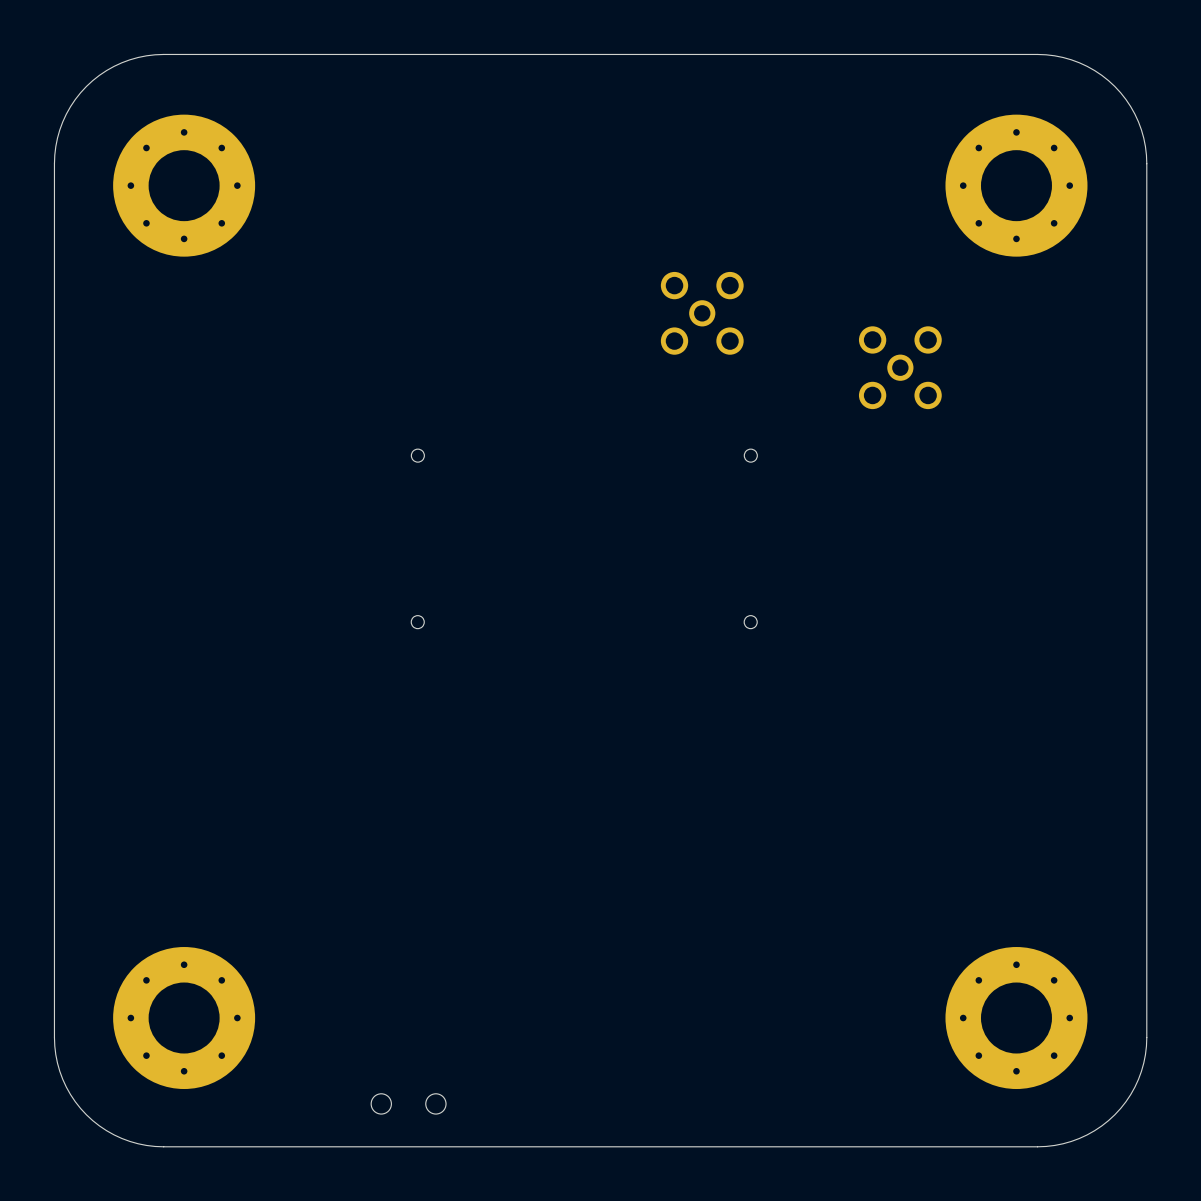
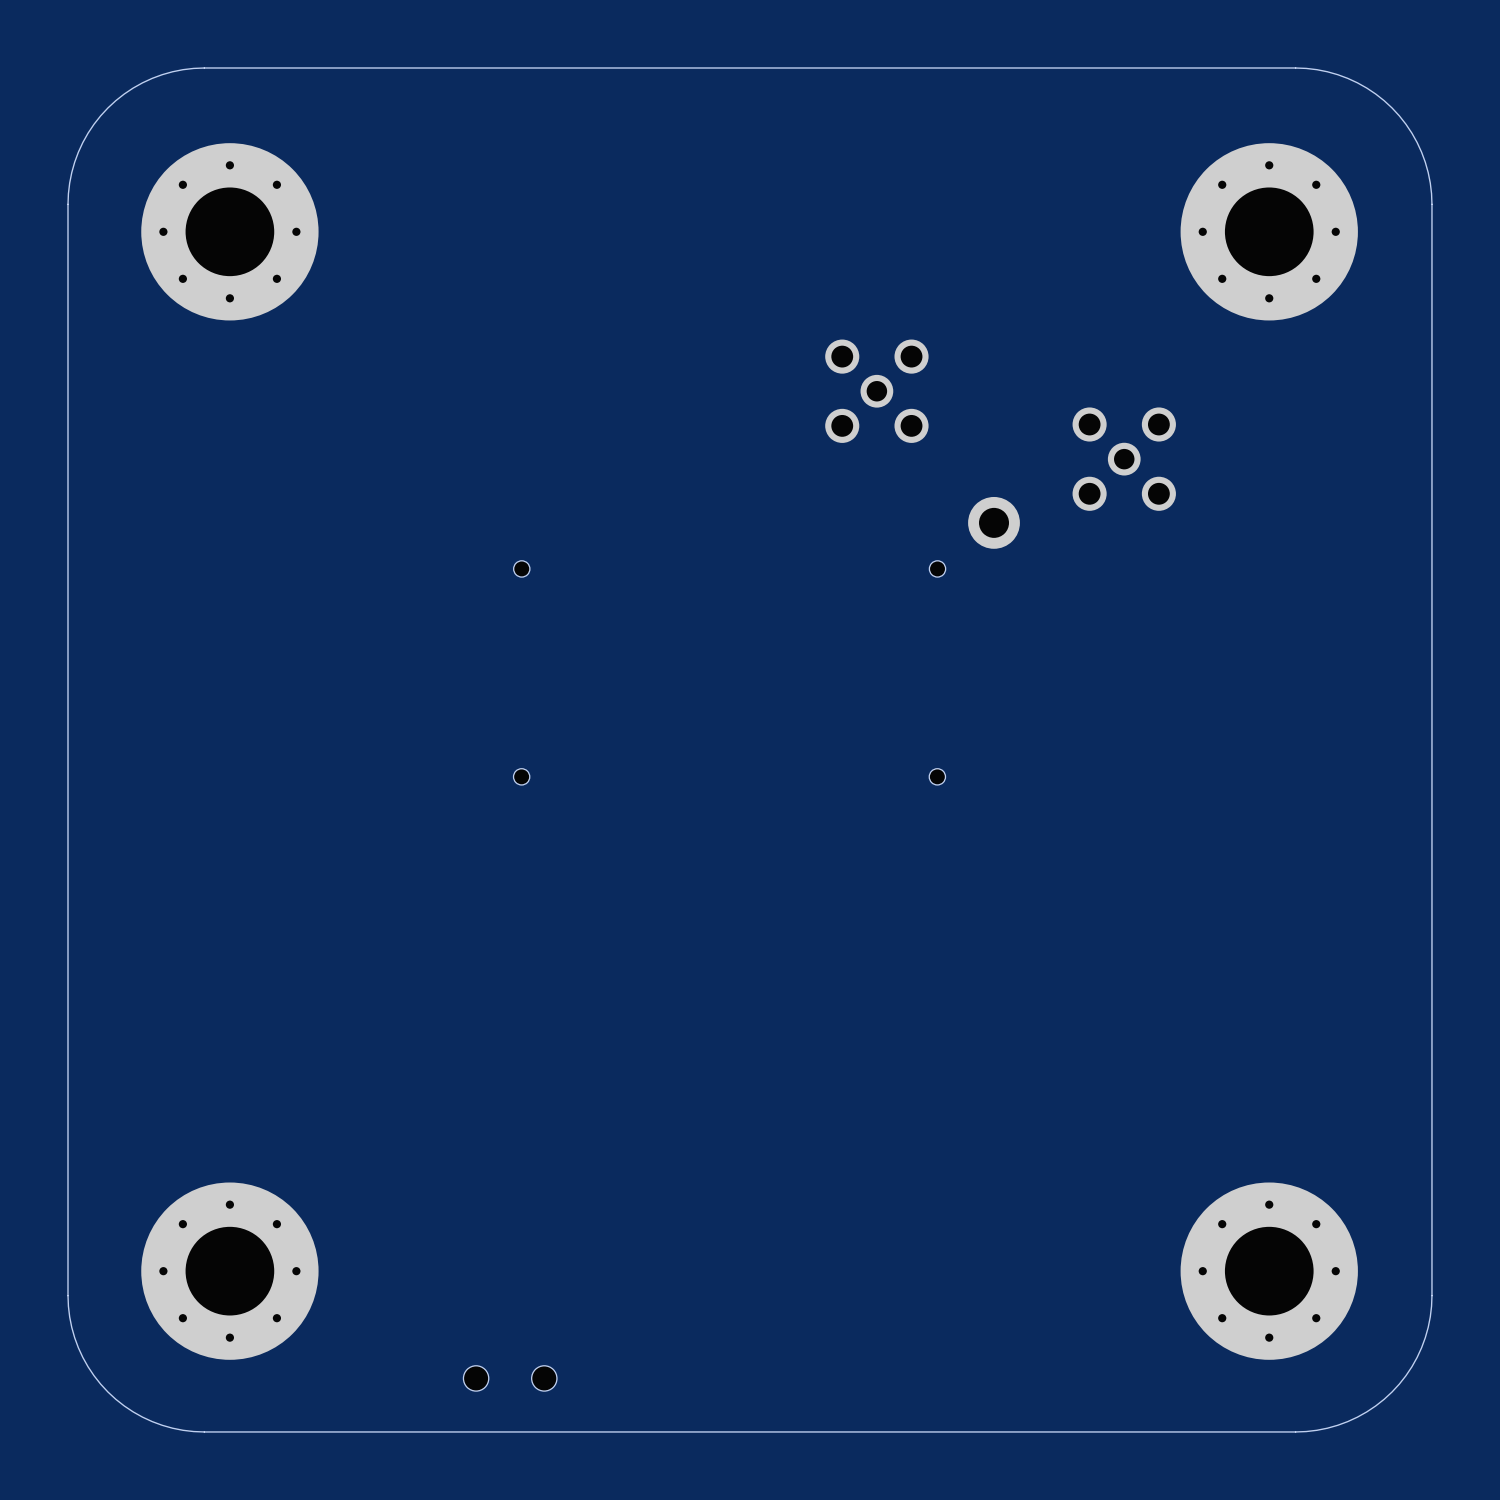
part: none -> (994, 522)

